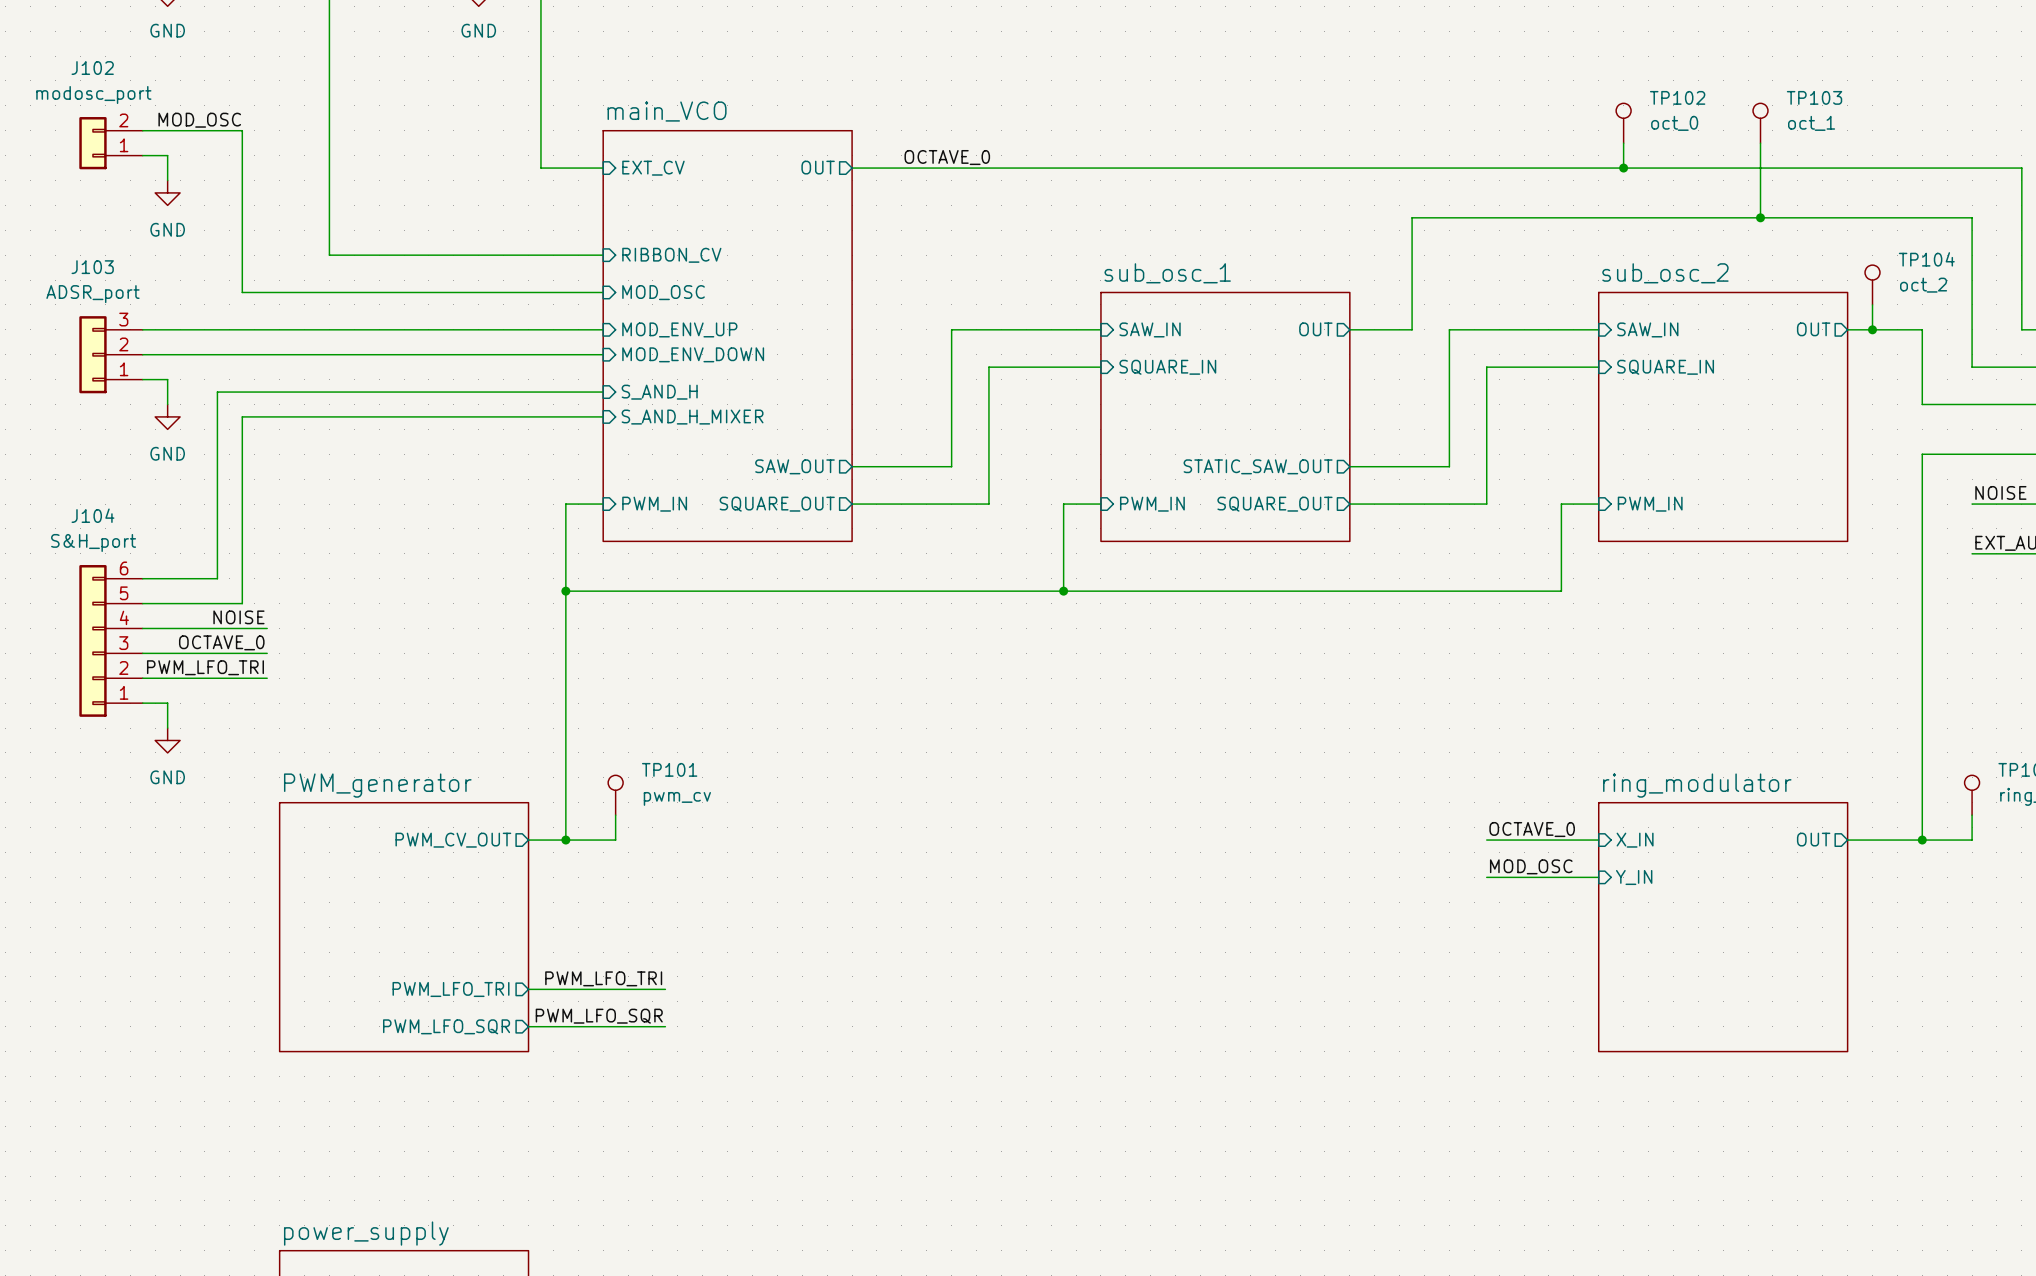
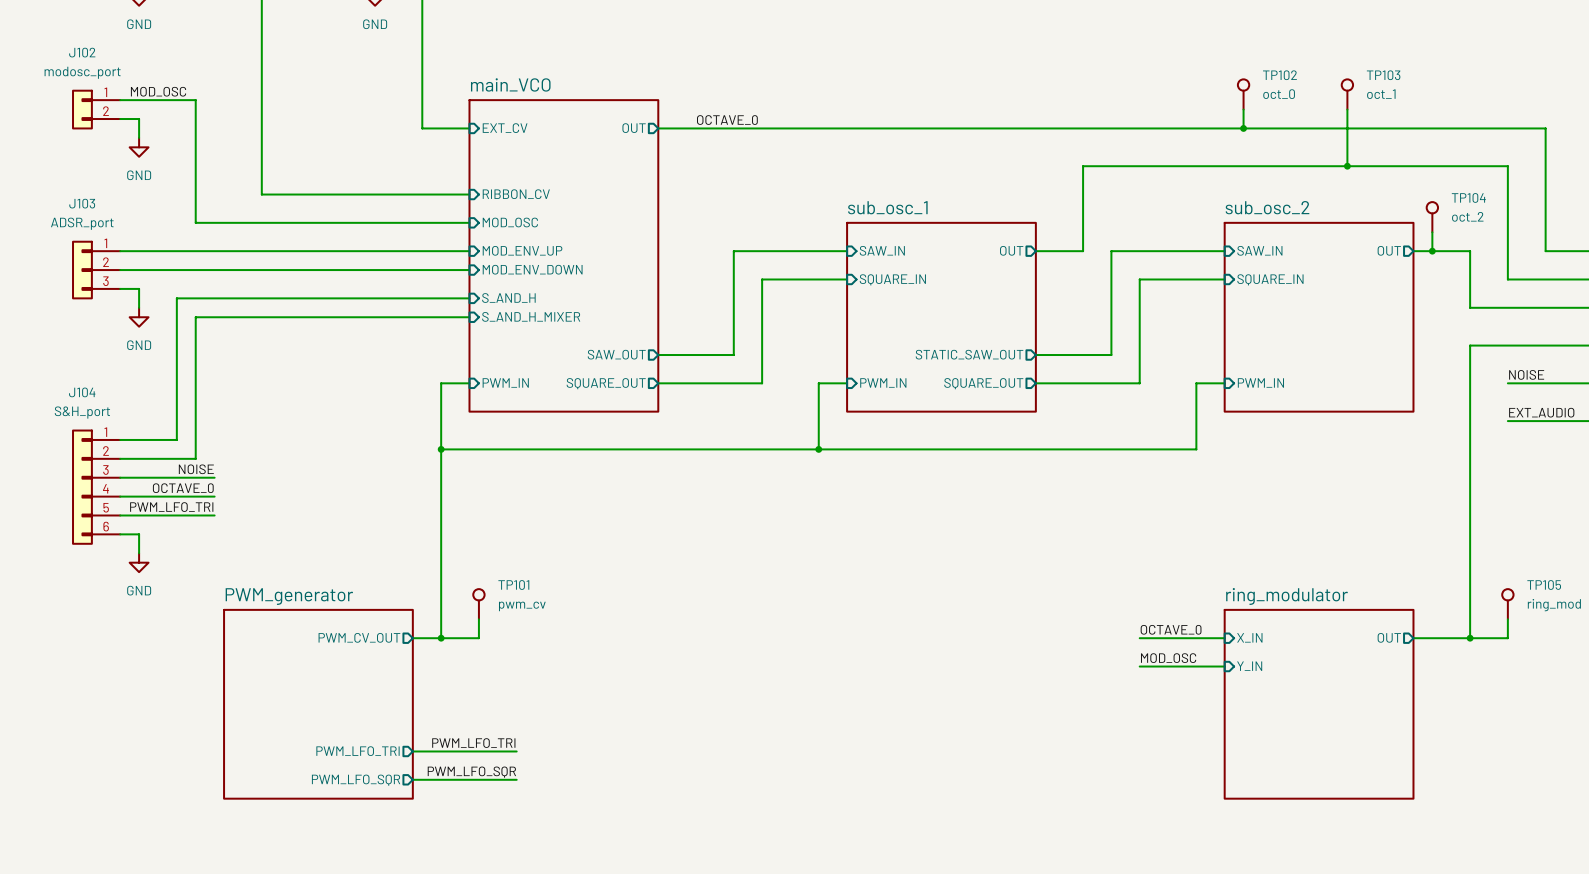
J102 flip: as is (92, 143) -> up-down (82, 109)
J103 flip: as is (92, 354) -> up-down (82, 270)
J104 flip: as is (92, 640) -> up-down (82, 487)

